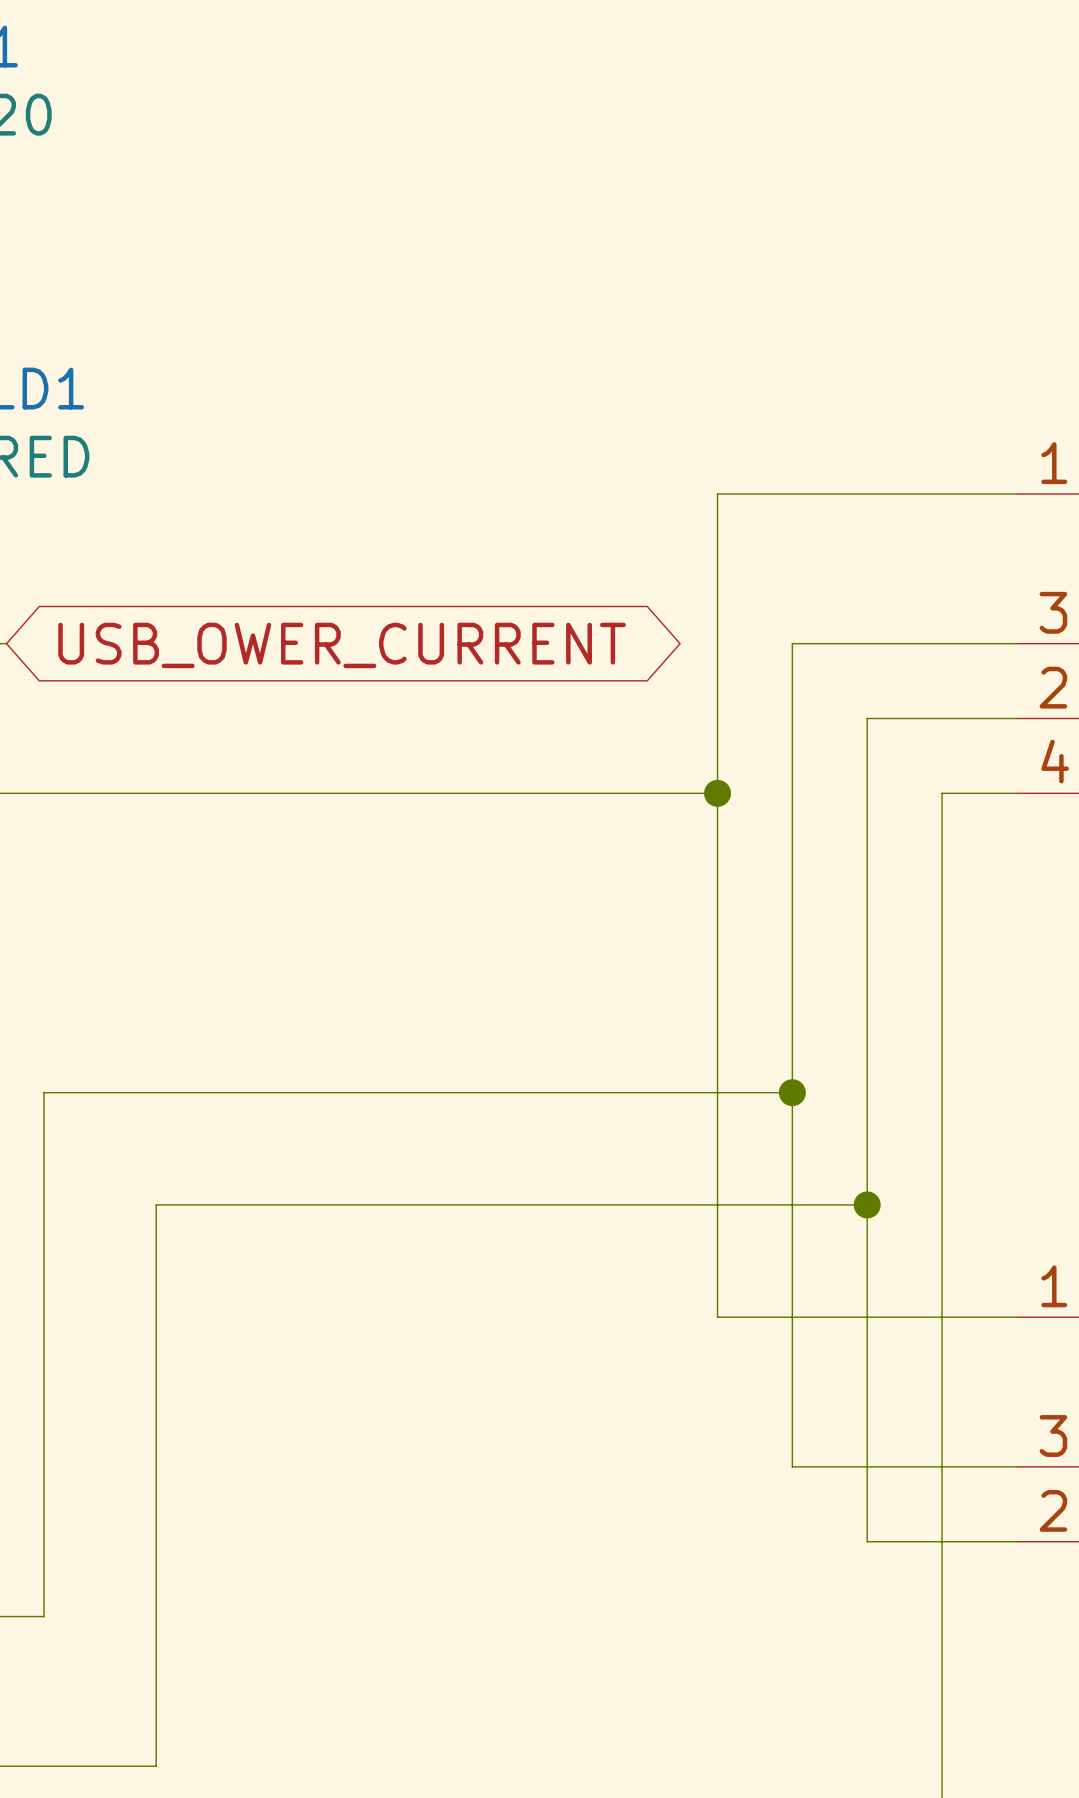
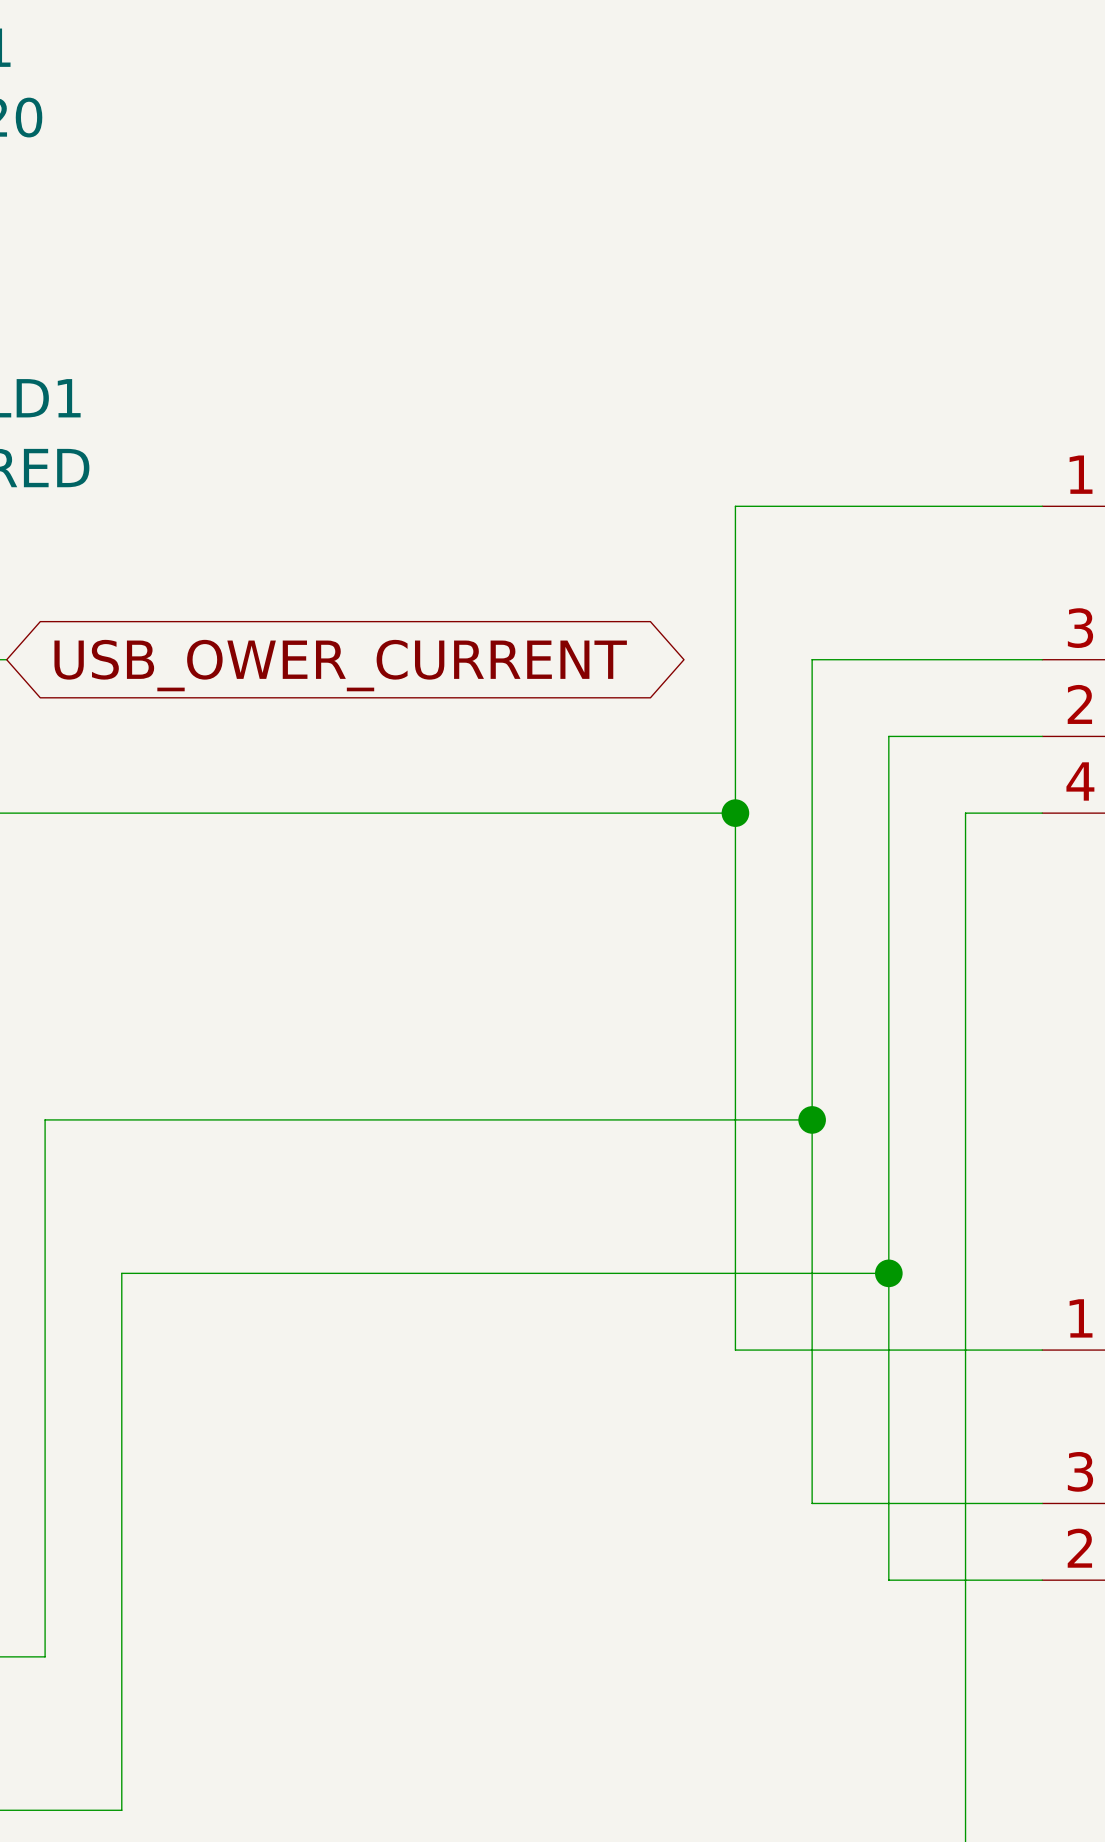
wire: (867, 1204) (156, 1204) (156, 1766) (118, 1766) -> (888, 1273) (121, 1273) (121, 1810)
junction position: (867, 1204) -> (888, 1273)

